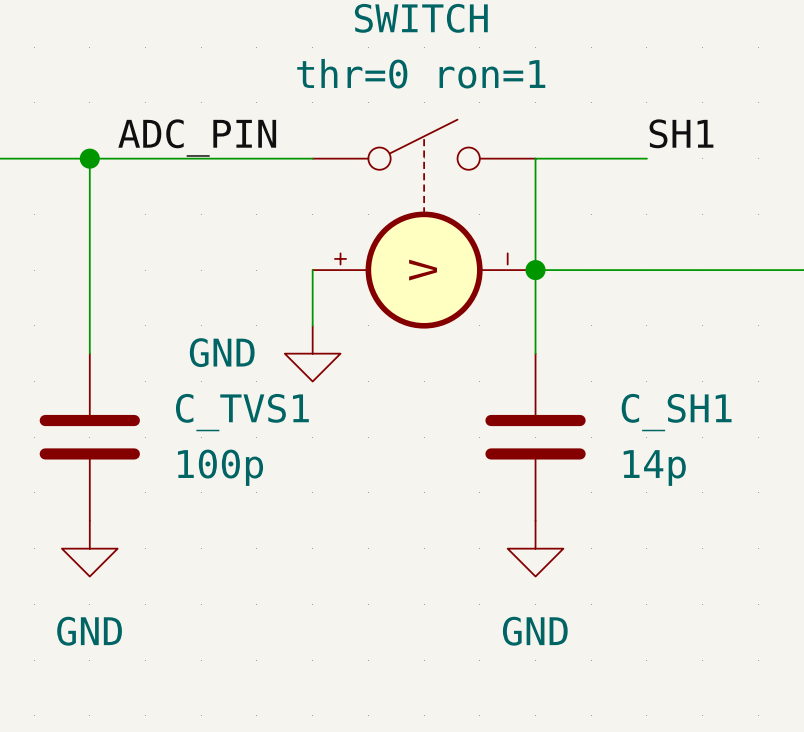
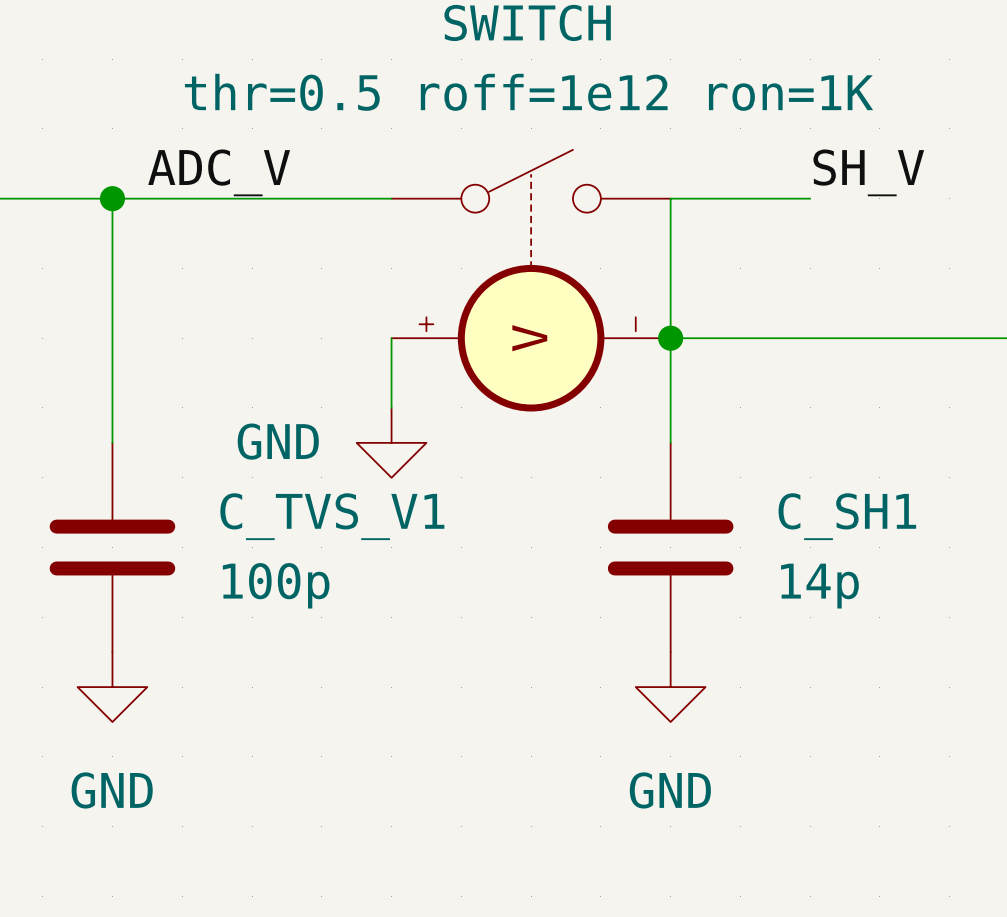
part text: thr=0 ron=1 (421, 73) -> thr=0.5 roff=1e12 ron=1K (529, 92)
label: SH1 (681, 133) -> SH_V (868, 172)
label: ADC_PIN (197, 138) -> ADC_V (219, 172)
C_TVS1 name: C_TVS1 (242, 412) -> C_TVS_V1 (332, 516)

